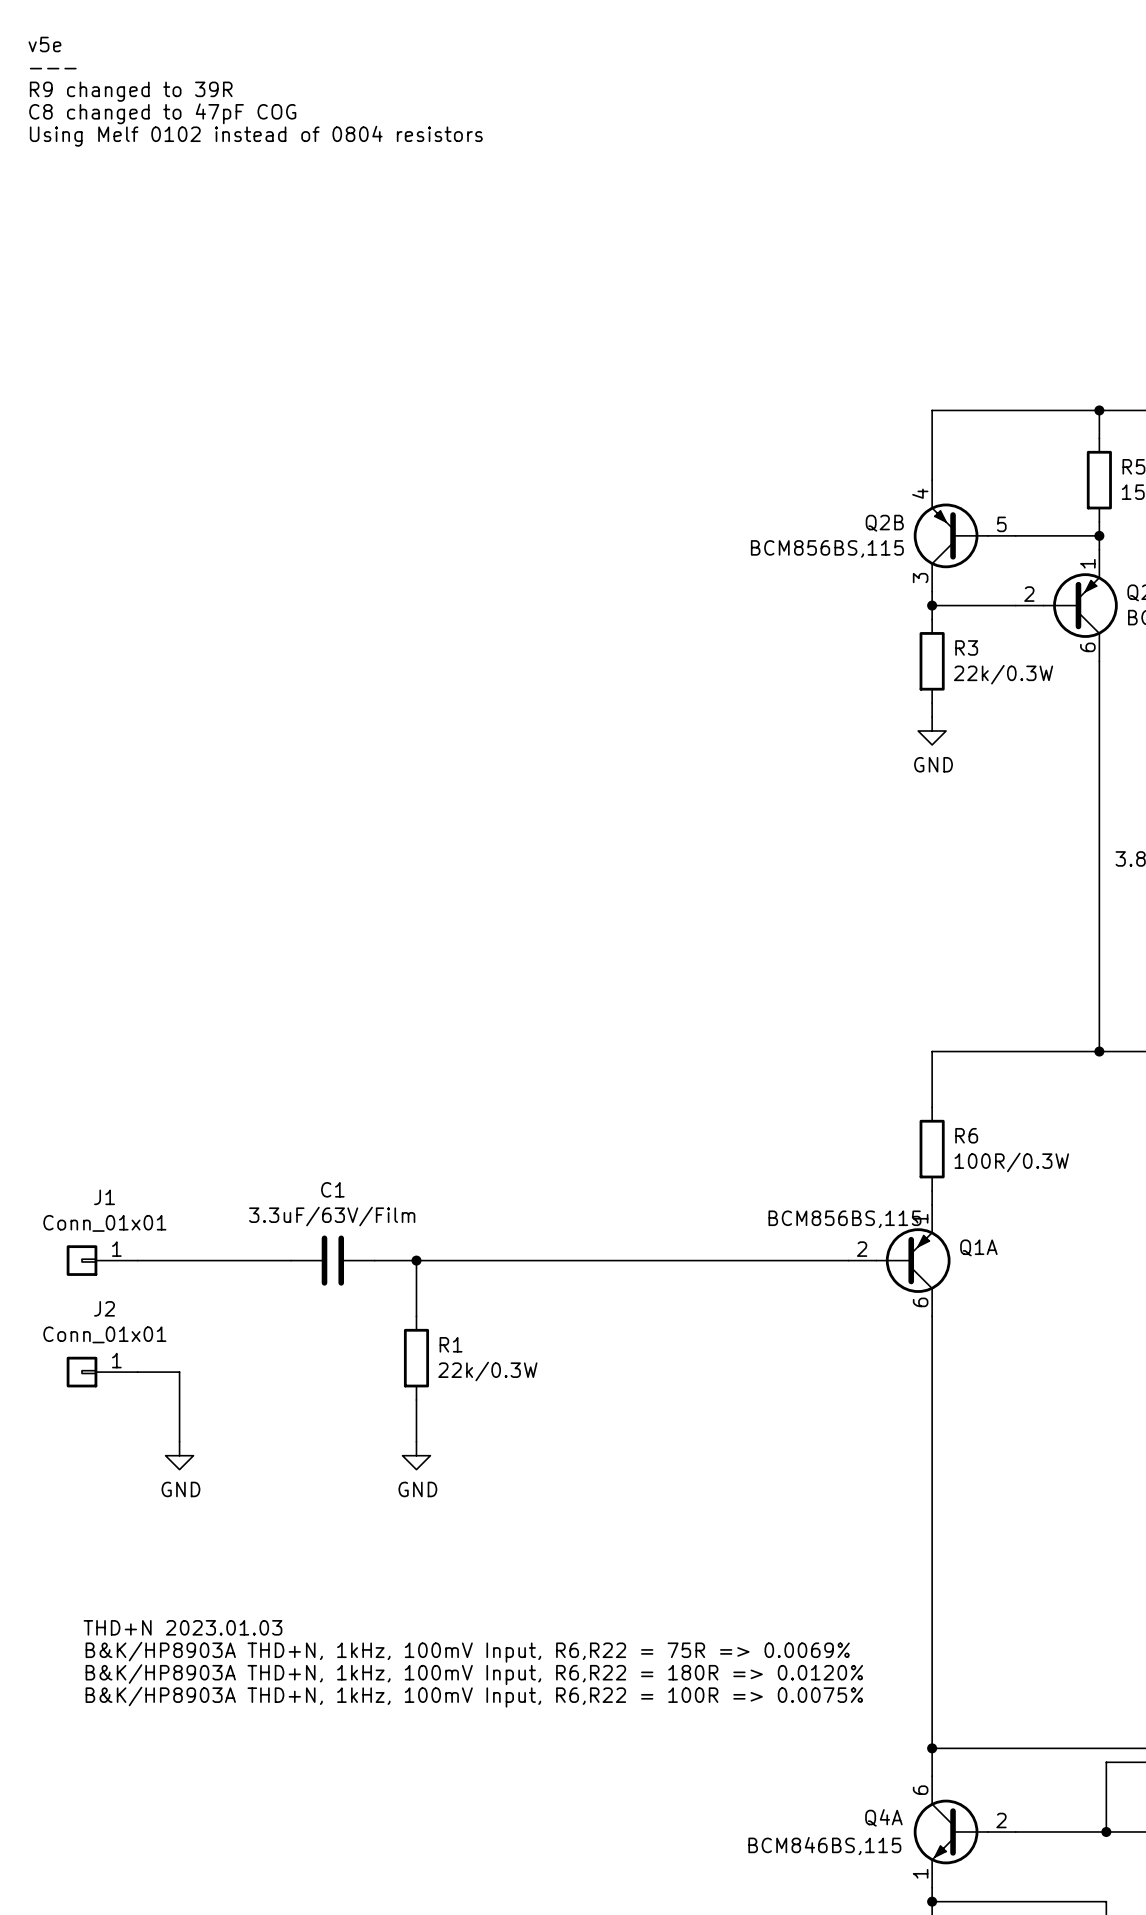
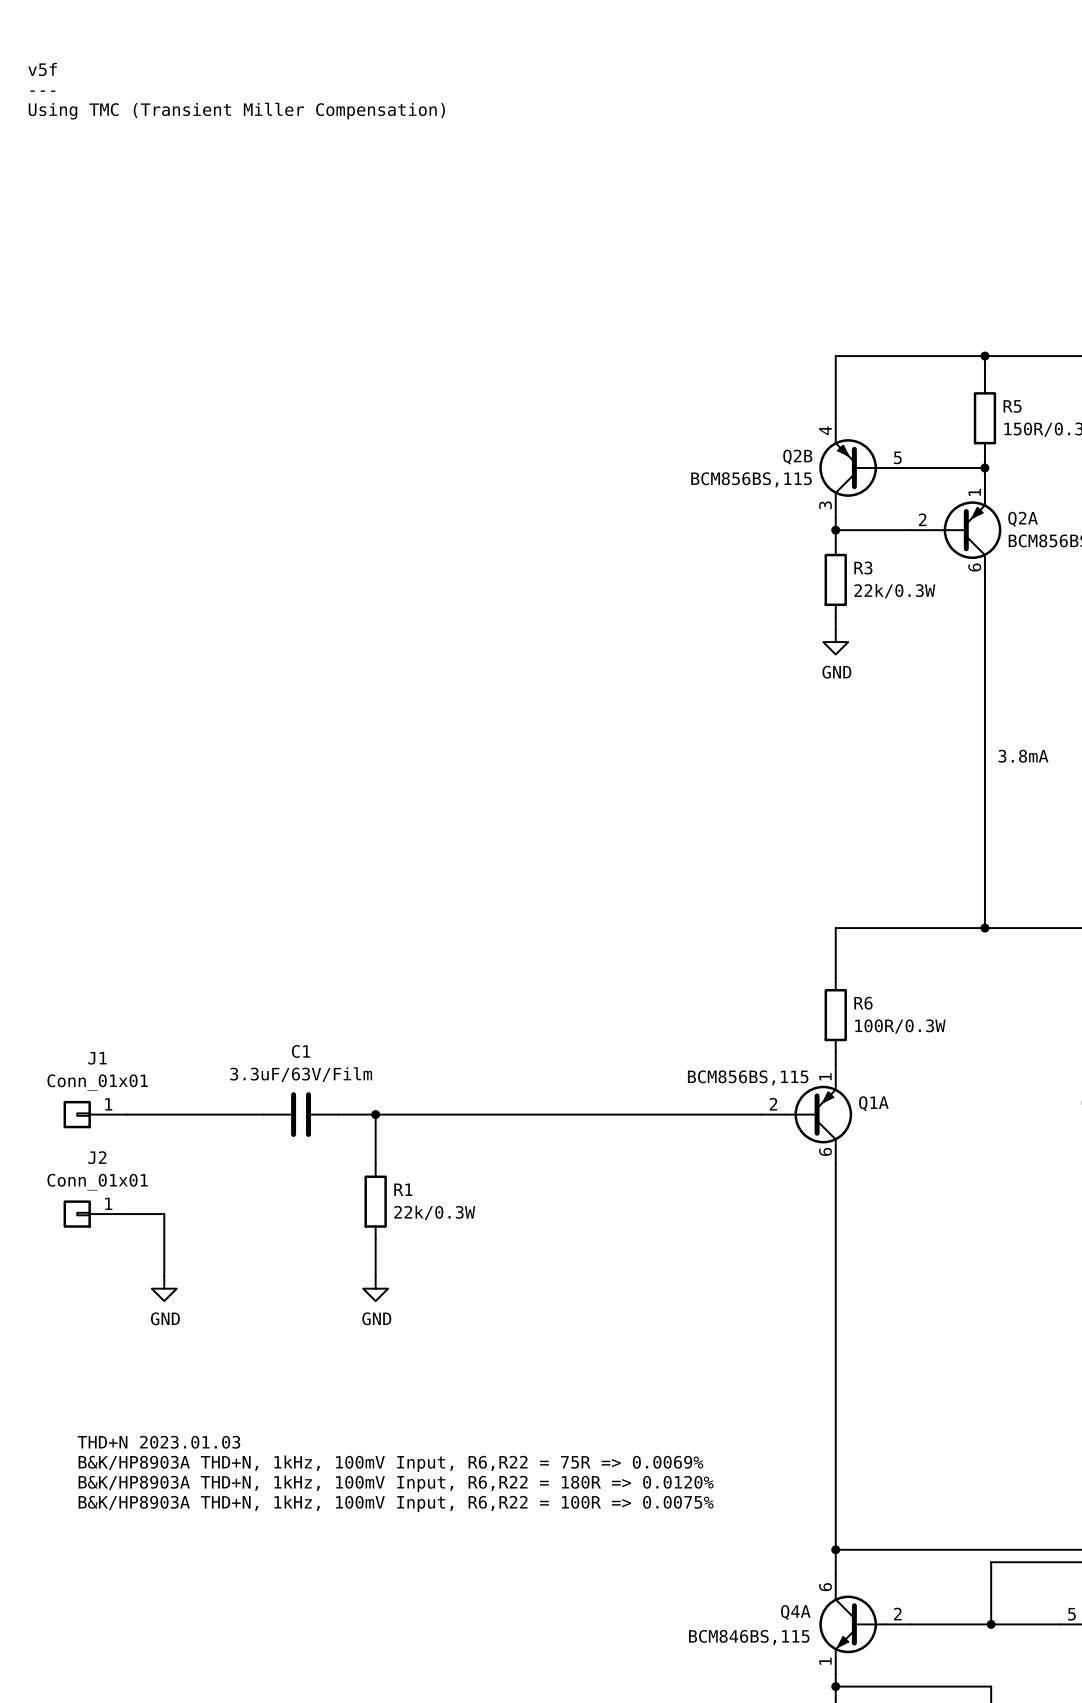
text: v5e (44, 44) -> none
text: --- (53, 68) -> none
text: R9 changed to 39R (131, 91) -> v5f (42, 69)
text: C8 changed to 47pF COG (162, 113) -> --- (42, 91)
text: Using Melf 0102 instead of 0804 resistors (256, 136) -> Using TMC (Transient Miller Compensation) (236, 111)

